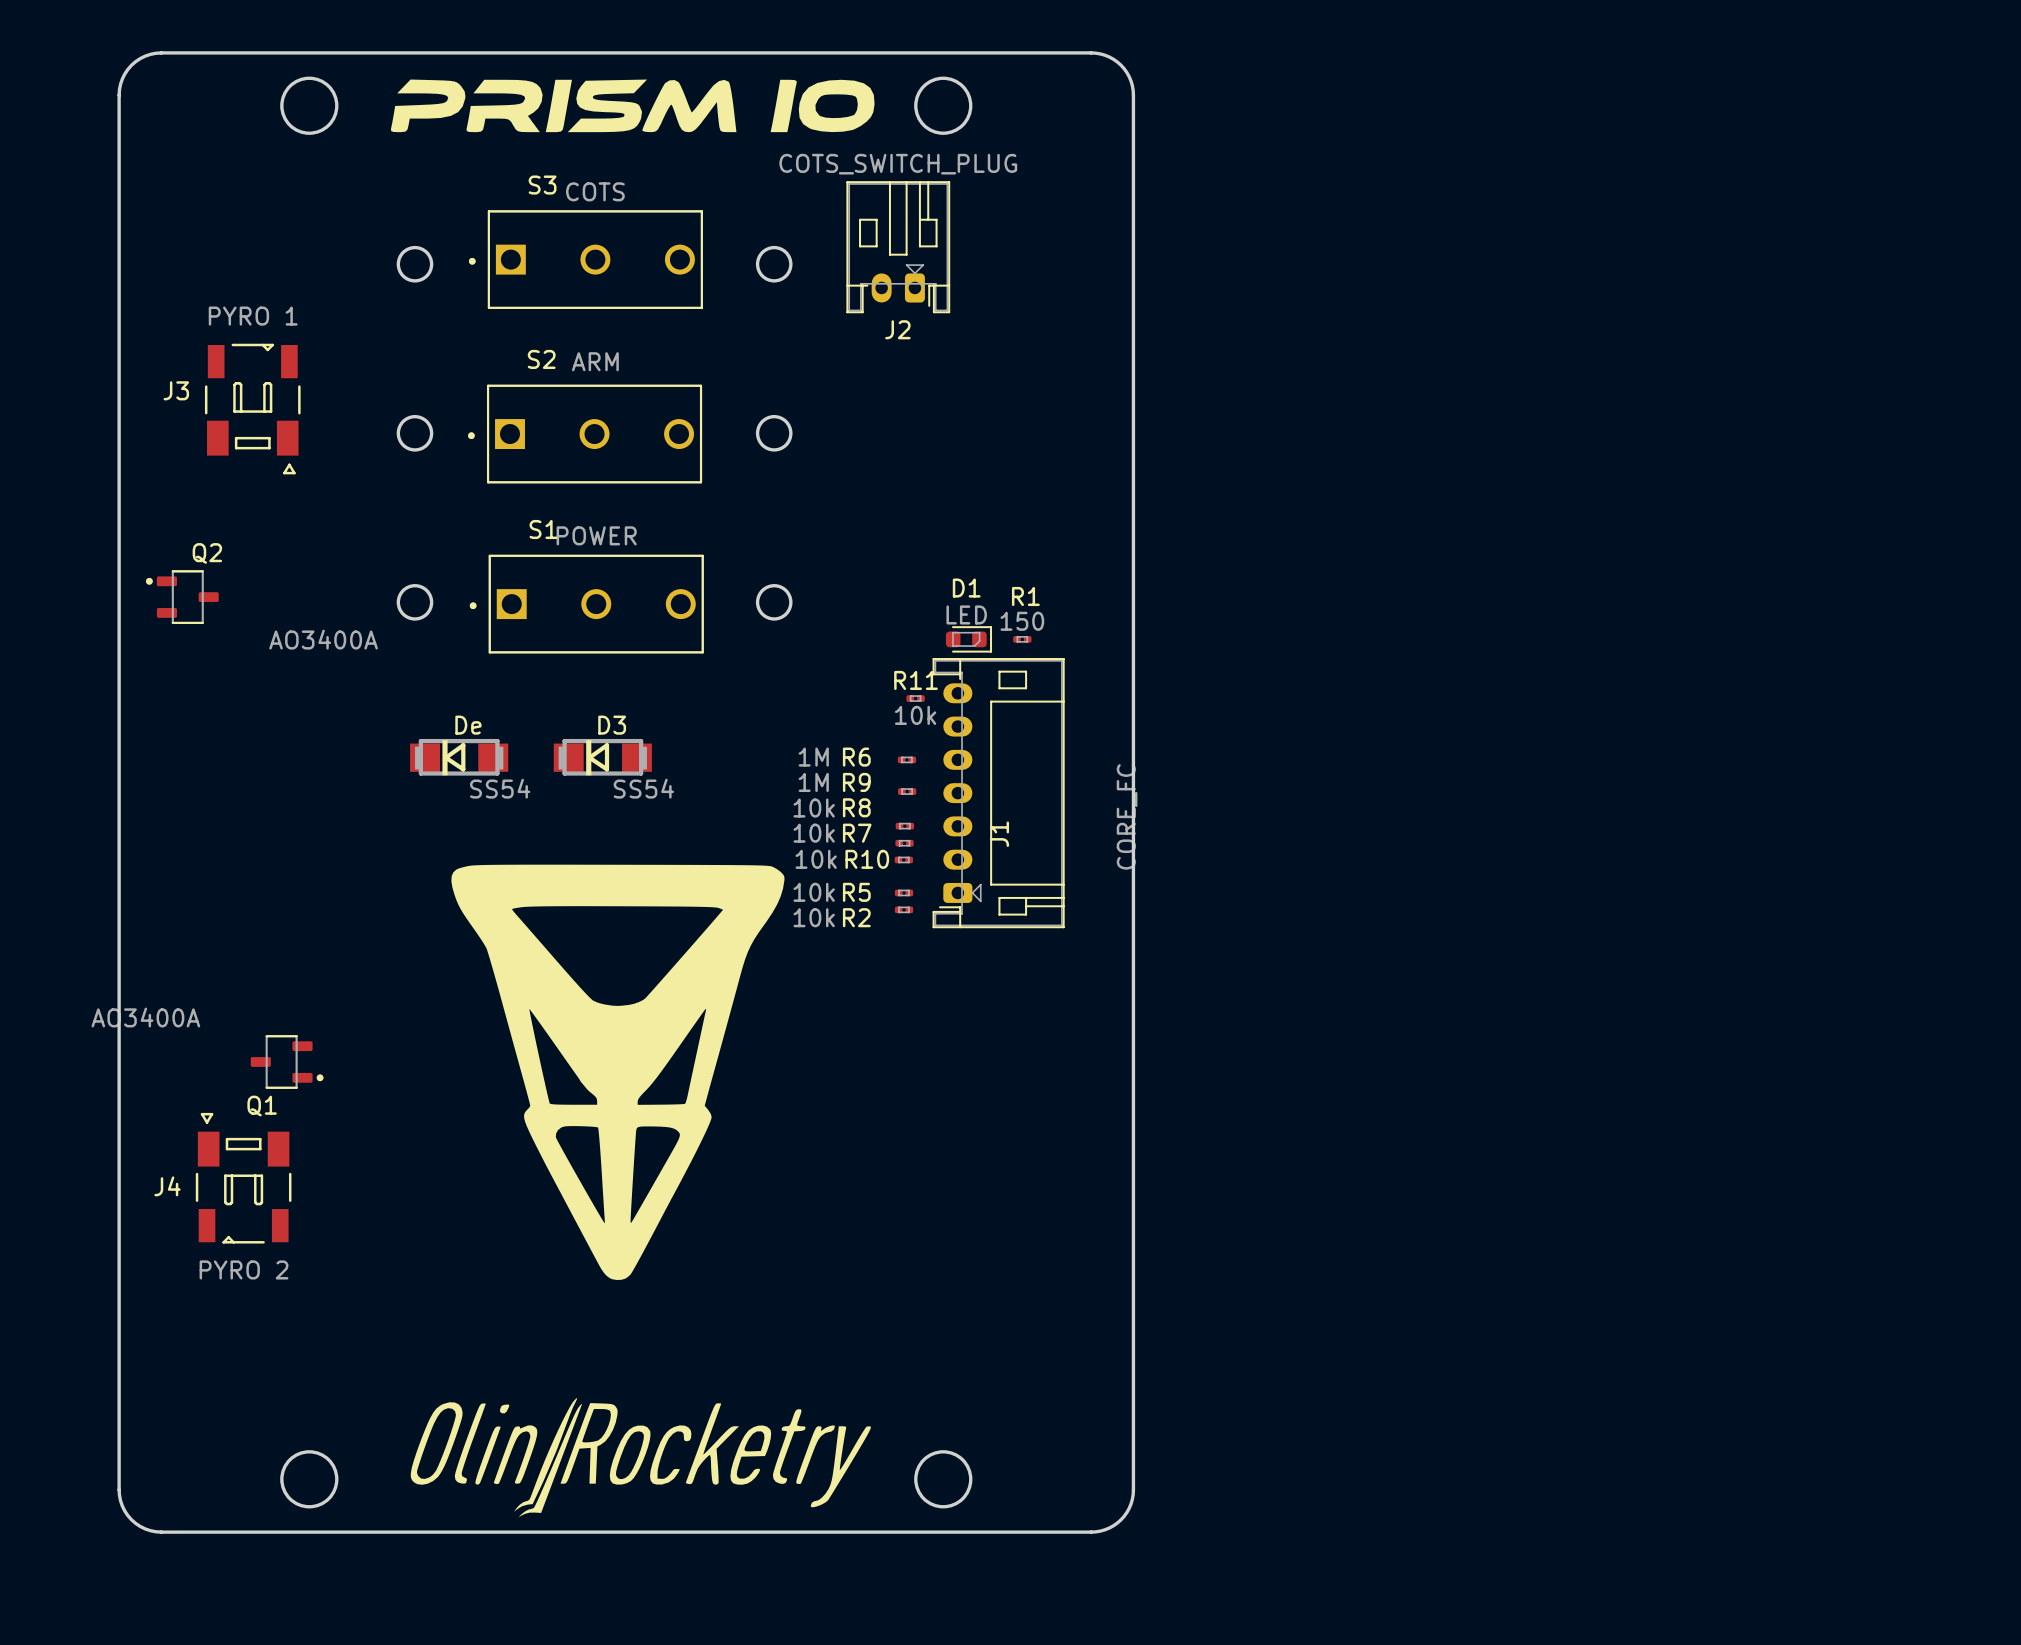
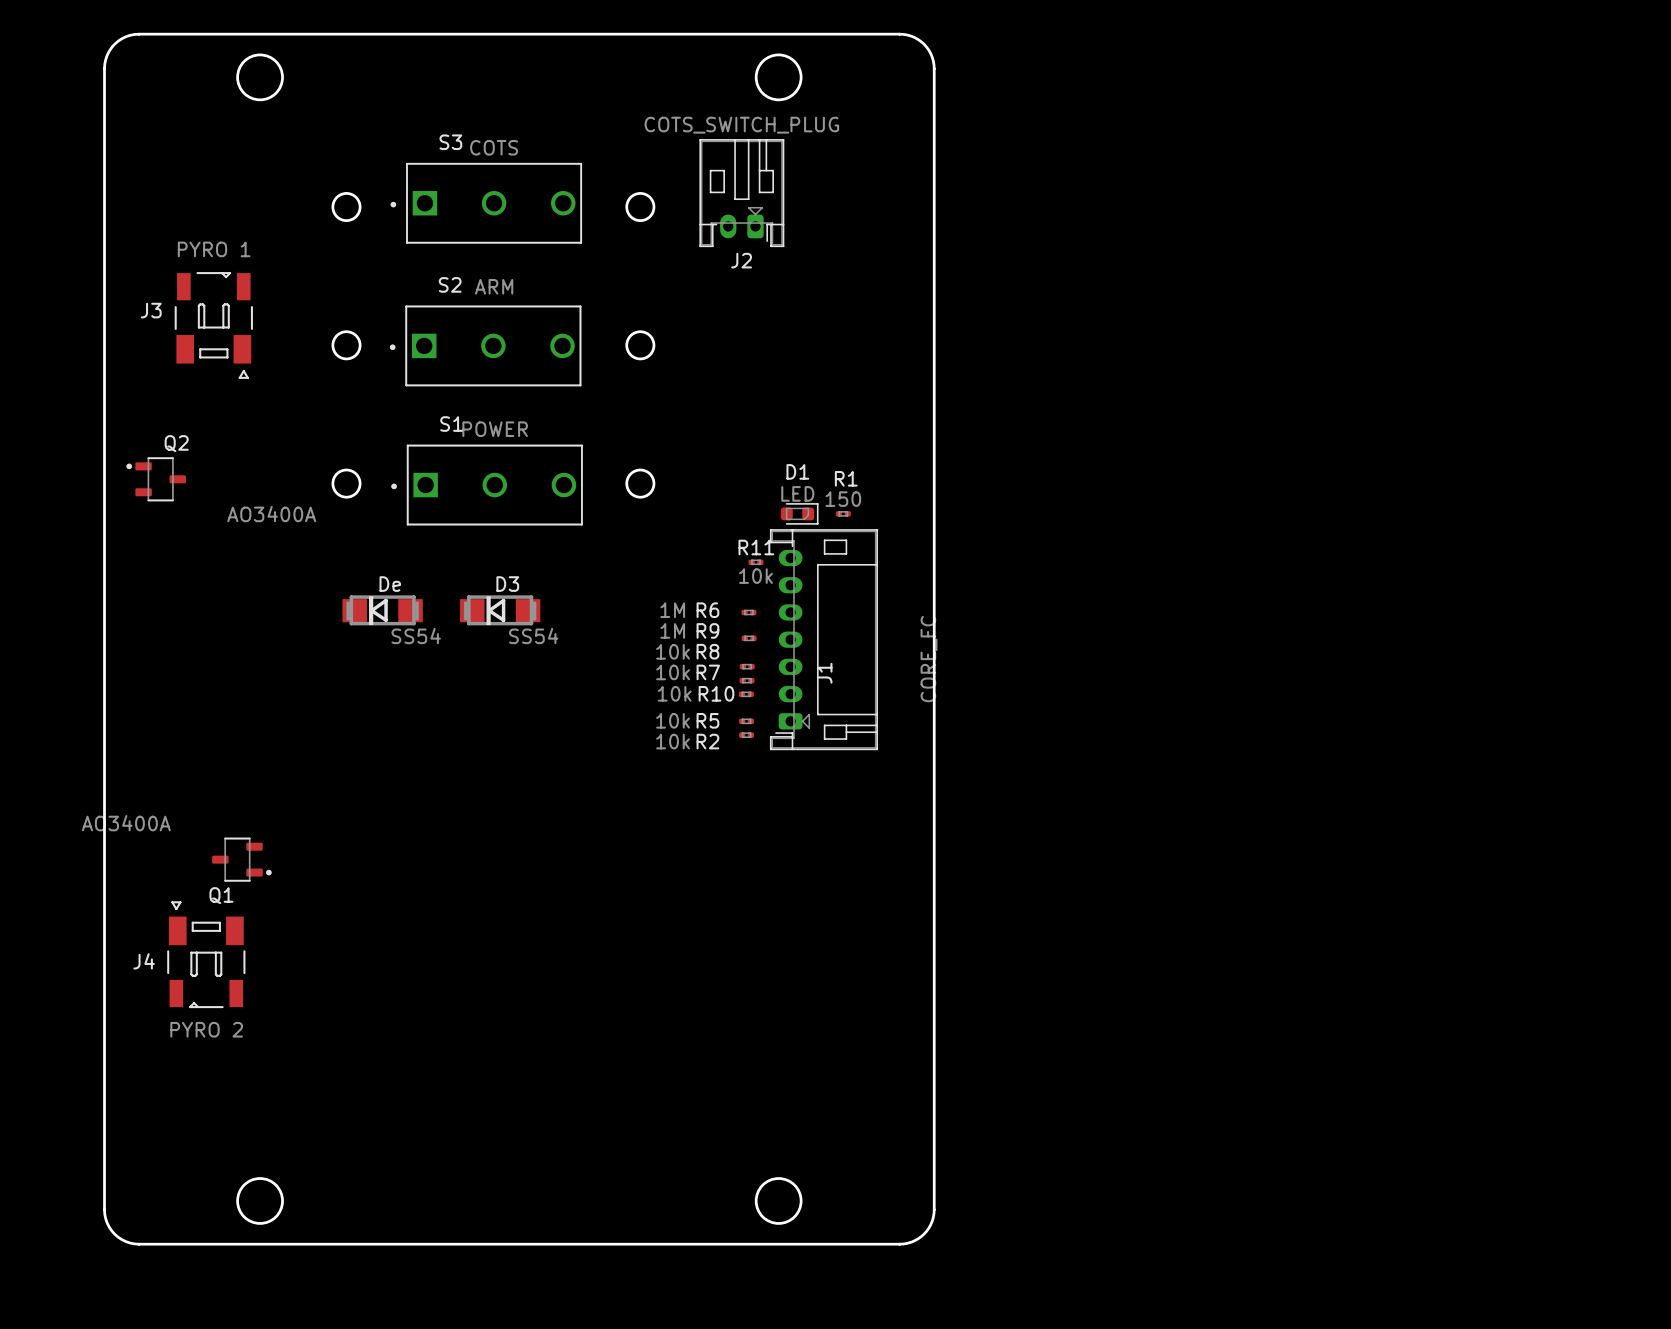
drawing: [390, 79, 875, 133] -> none
part: (617, 1072) -> none
drawing: [410, 1398, 871, 1518] -> none

